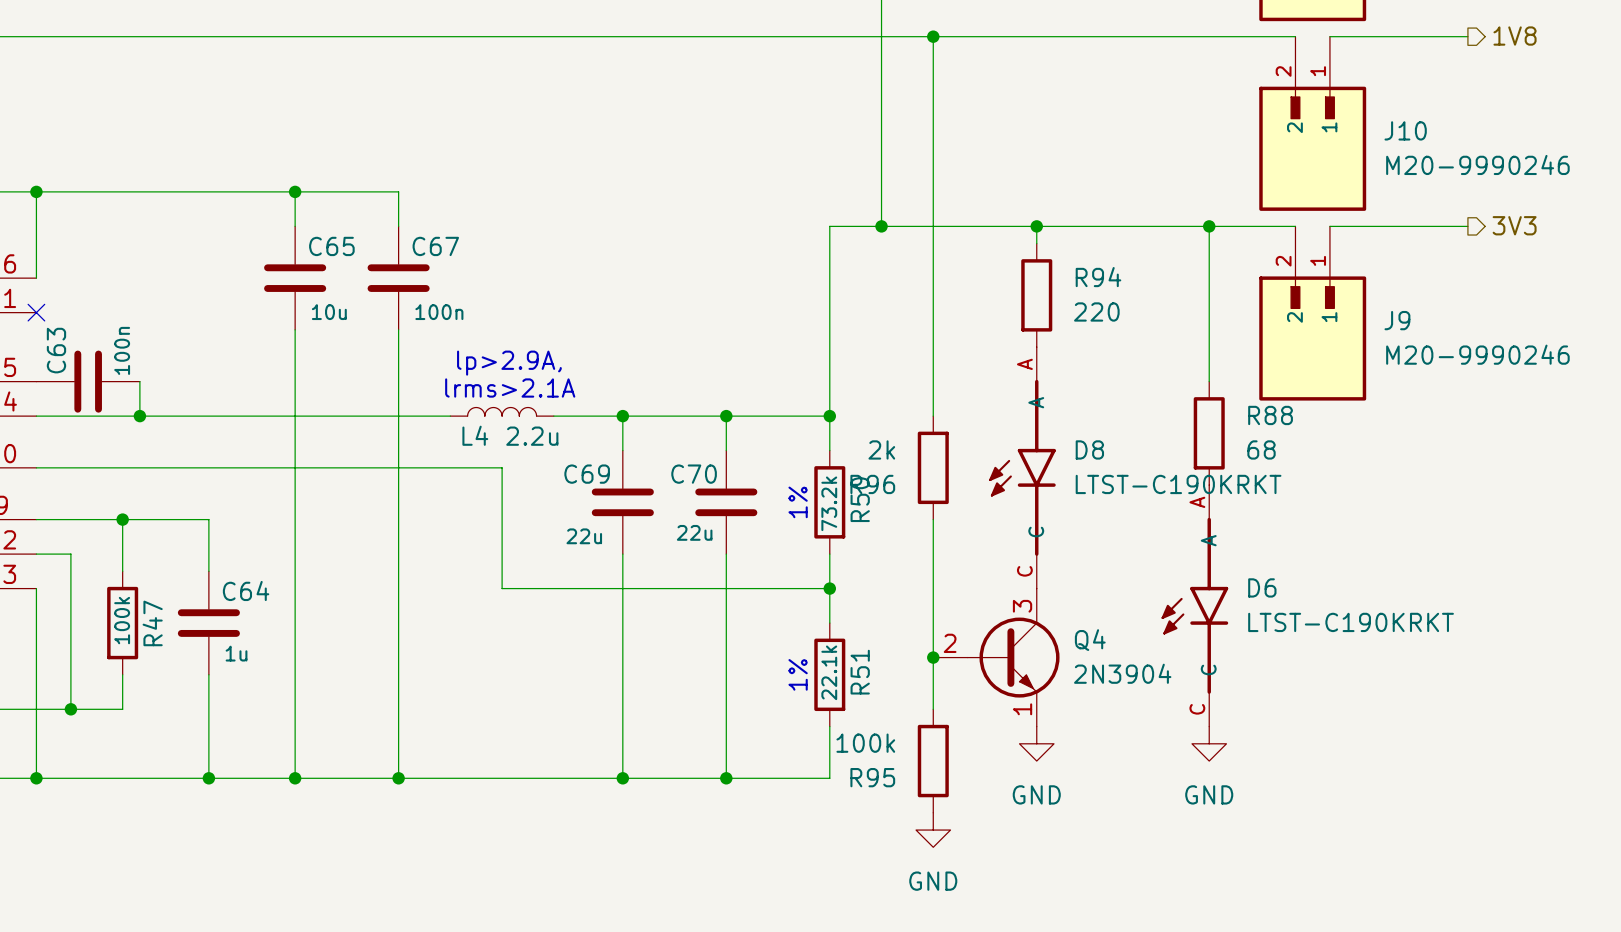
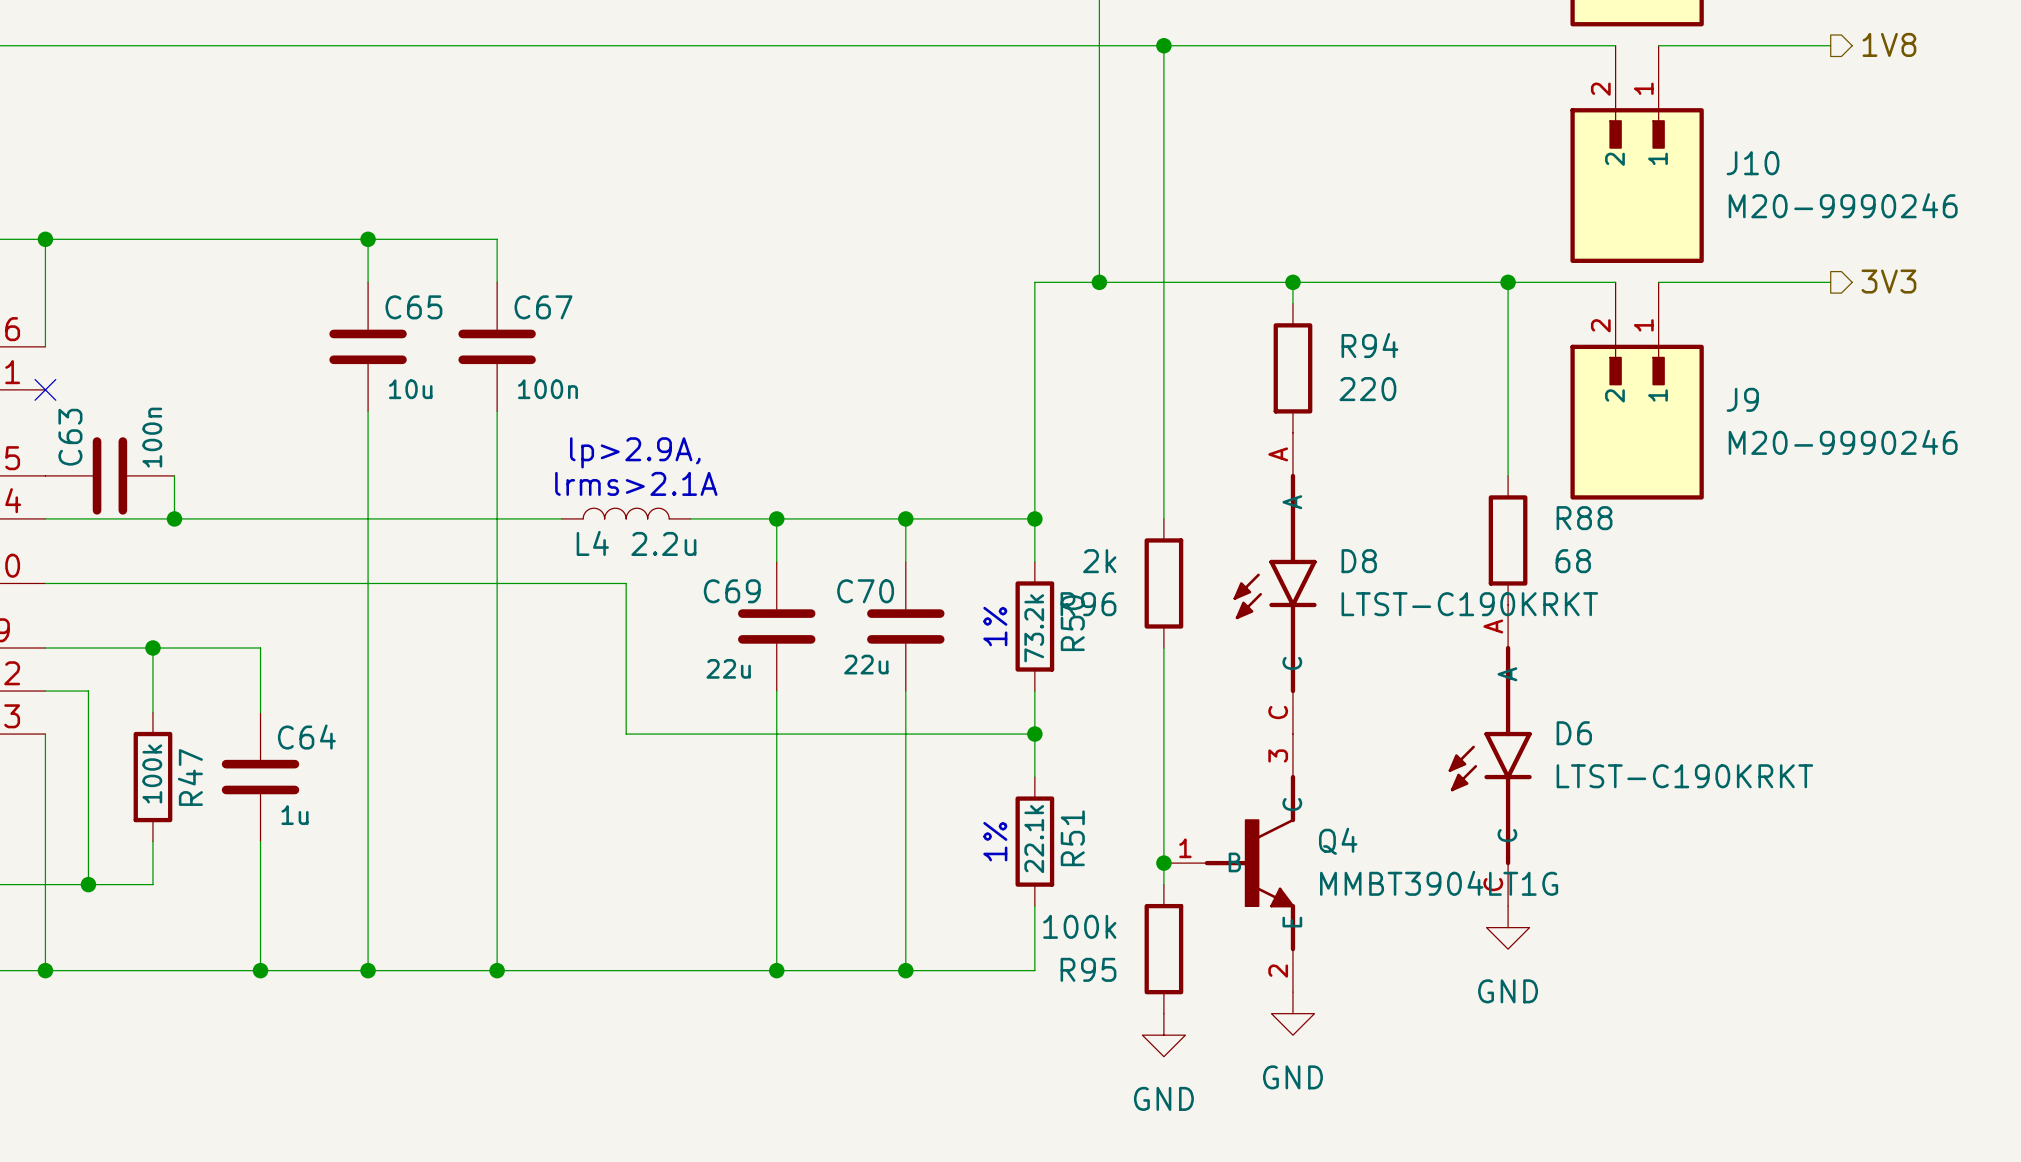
Q4 symbol: [933, 588, 1060, 727] -> [1163, 734, 1296, 993]
junction position: (933, 657) -> (1163, 863)
Q4 value: 2N3904 (1122, 673) -> MMBT3904LT1G (1439, 883)
power symbol position: GND (1036, 743) -> GND (1292, 1013)

